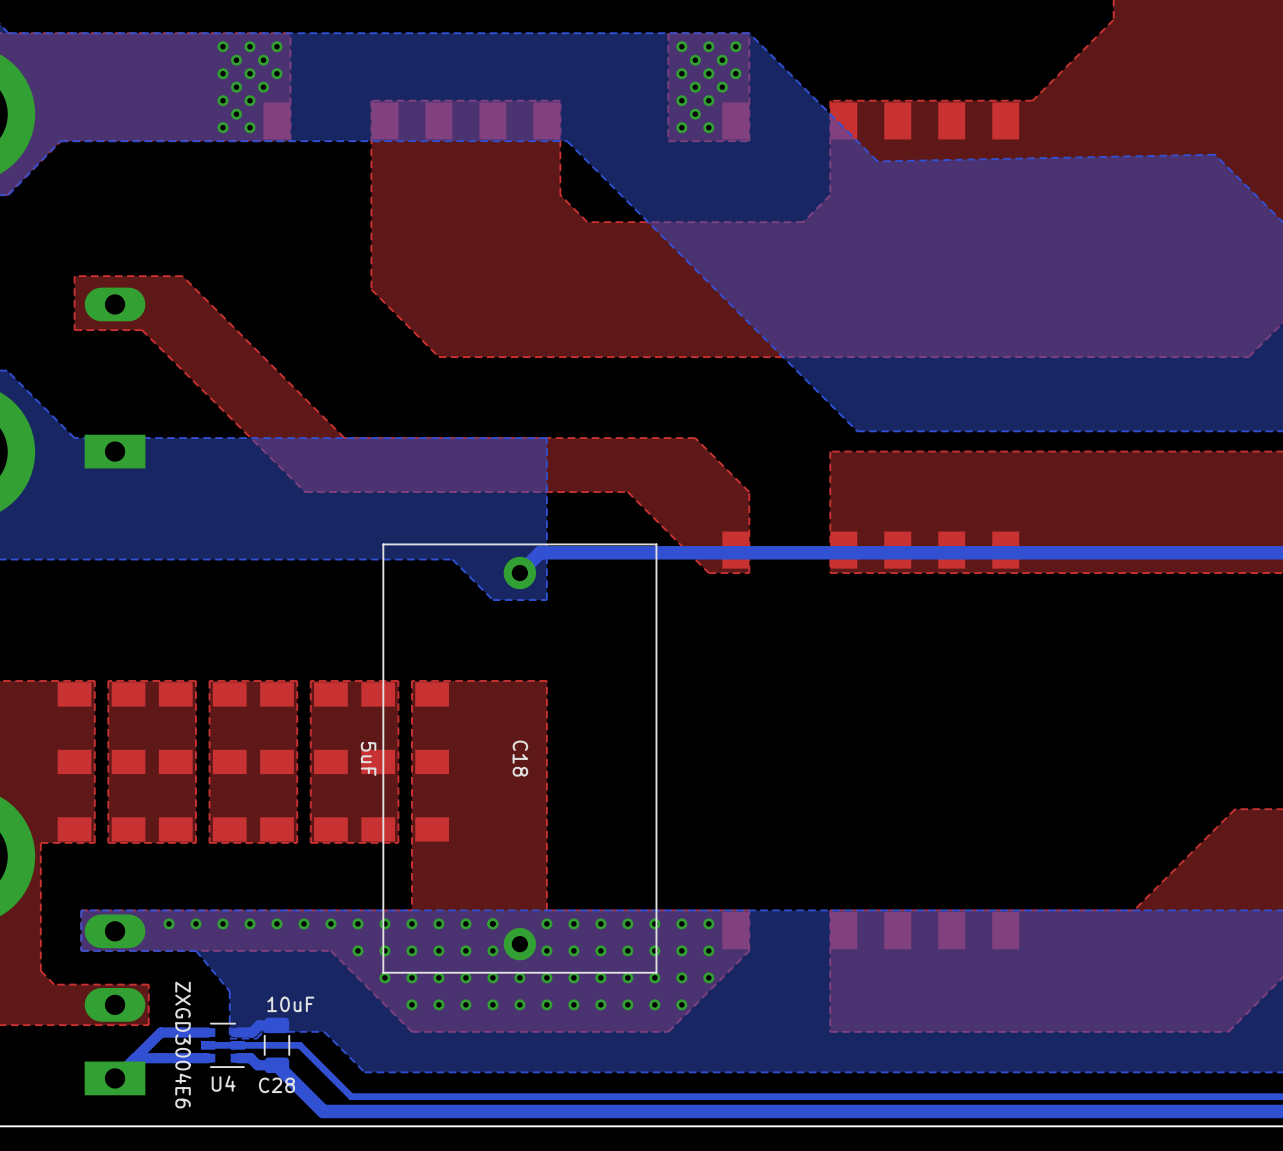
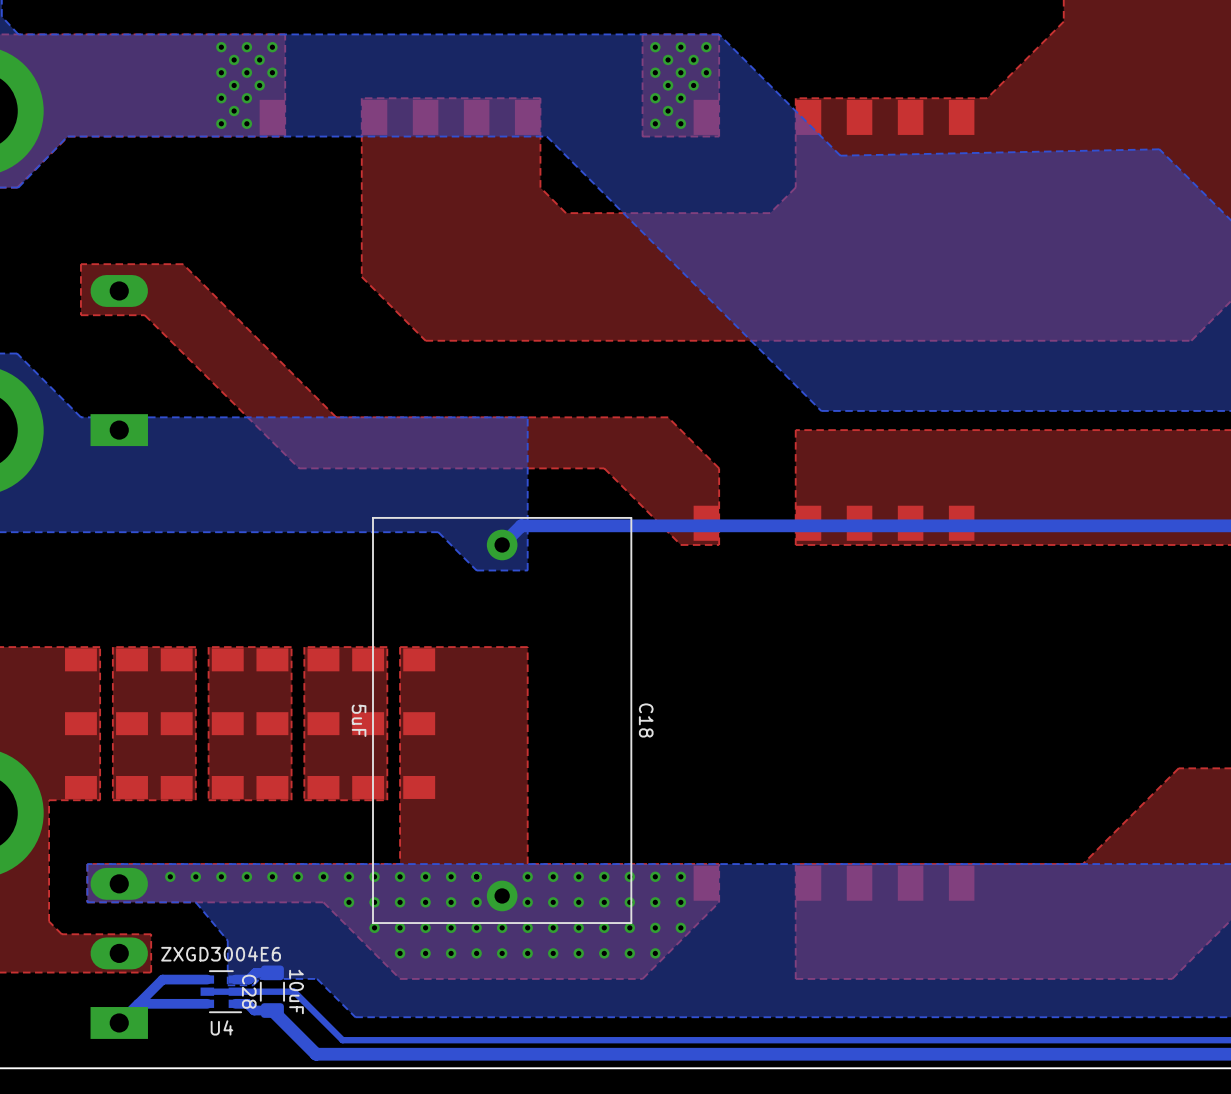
C18 name position: C18 (520, 758) -> C18 (646, 720)
C28 value rotation: 0° (290, 1004) -> 90° clockwise (296, 992)
U4 value rotation: 0° (183, 1045) -> 90° counterclockwise (221, 953)
C28 name rotation: 0° (276, 1085) -> 90° clockwise (249, 991)
C28 name position: C28 (276, 1085) -> C28 (249, 991)

